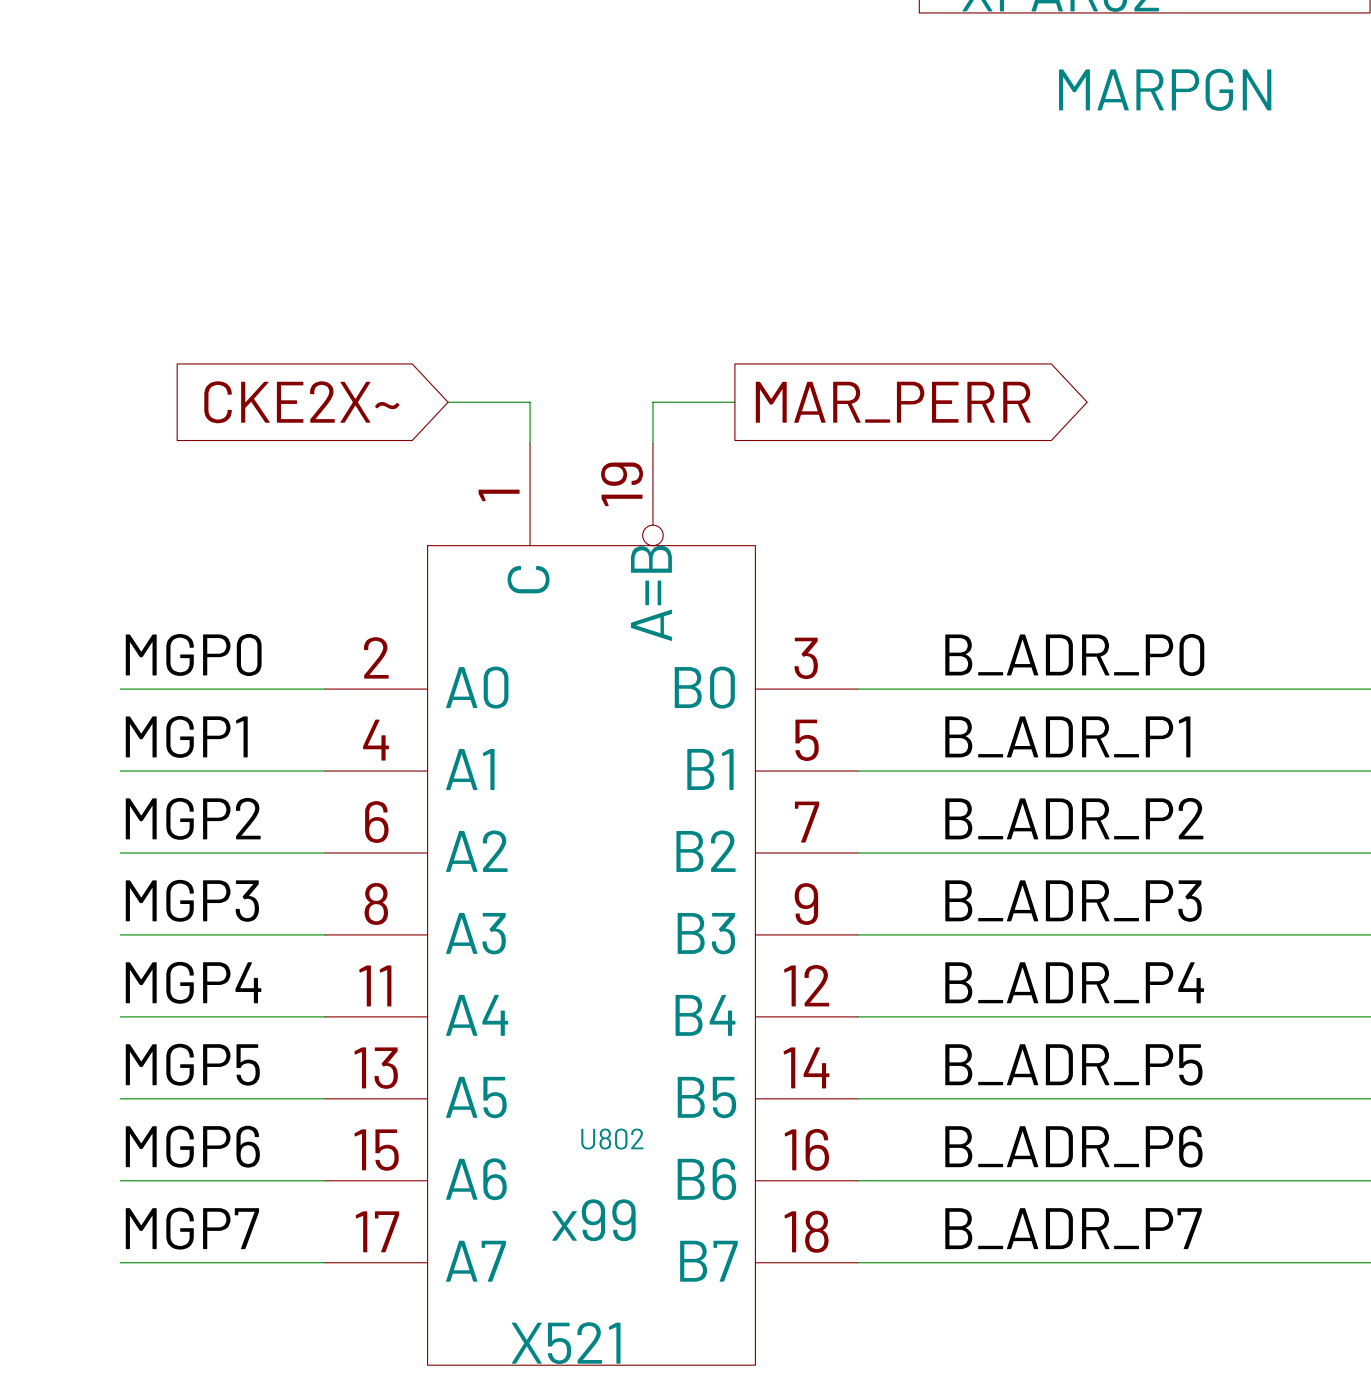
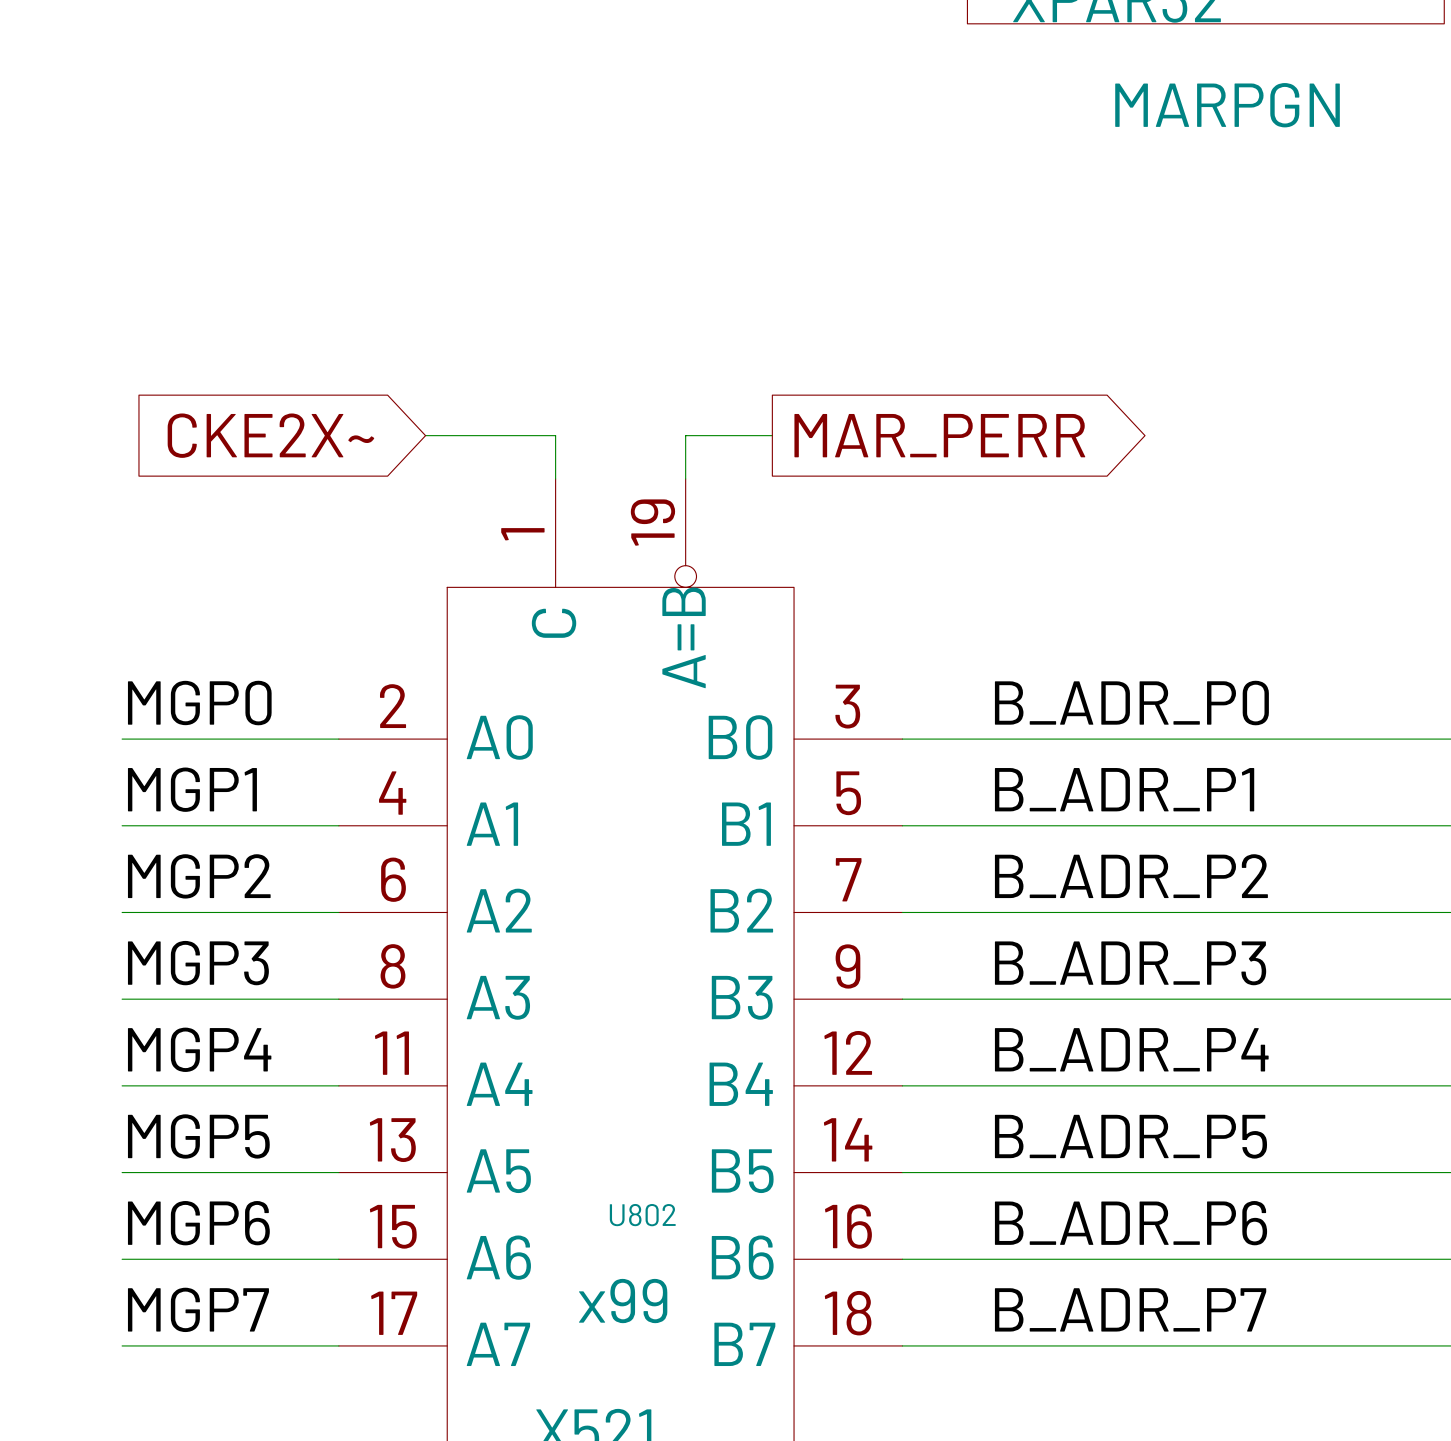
global label position: CKE2X~ (301, 402) -> CKE2X~ (271, 435)
wire: none -> (425, 435) (468, 435)

